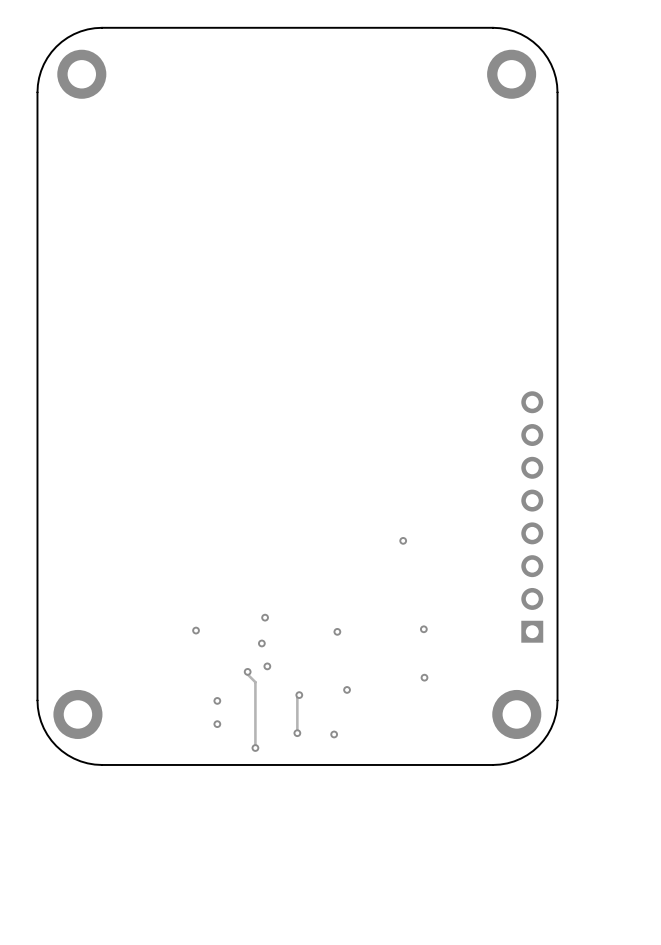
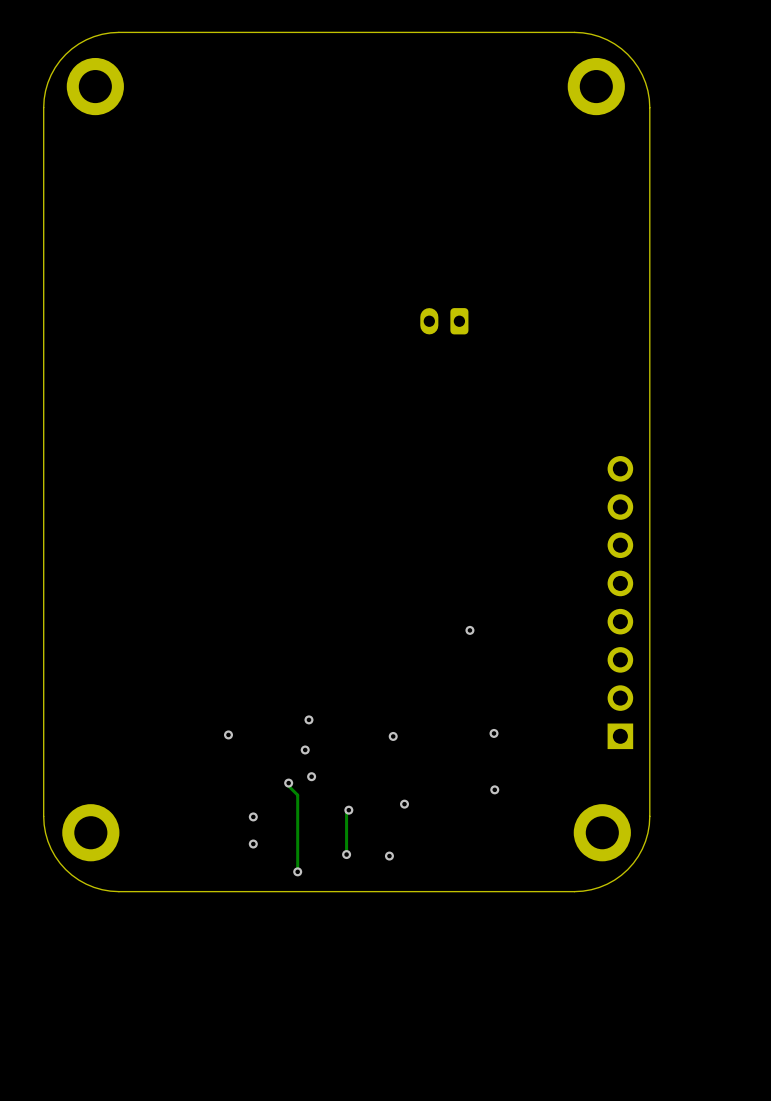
part: none -> (444, 321)

